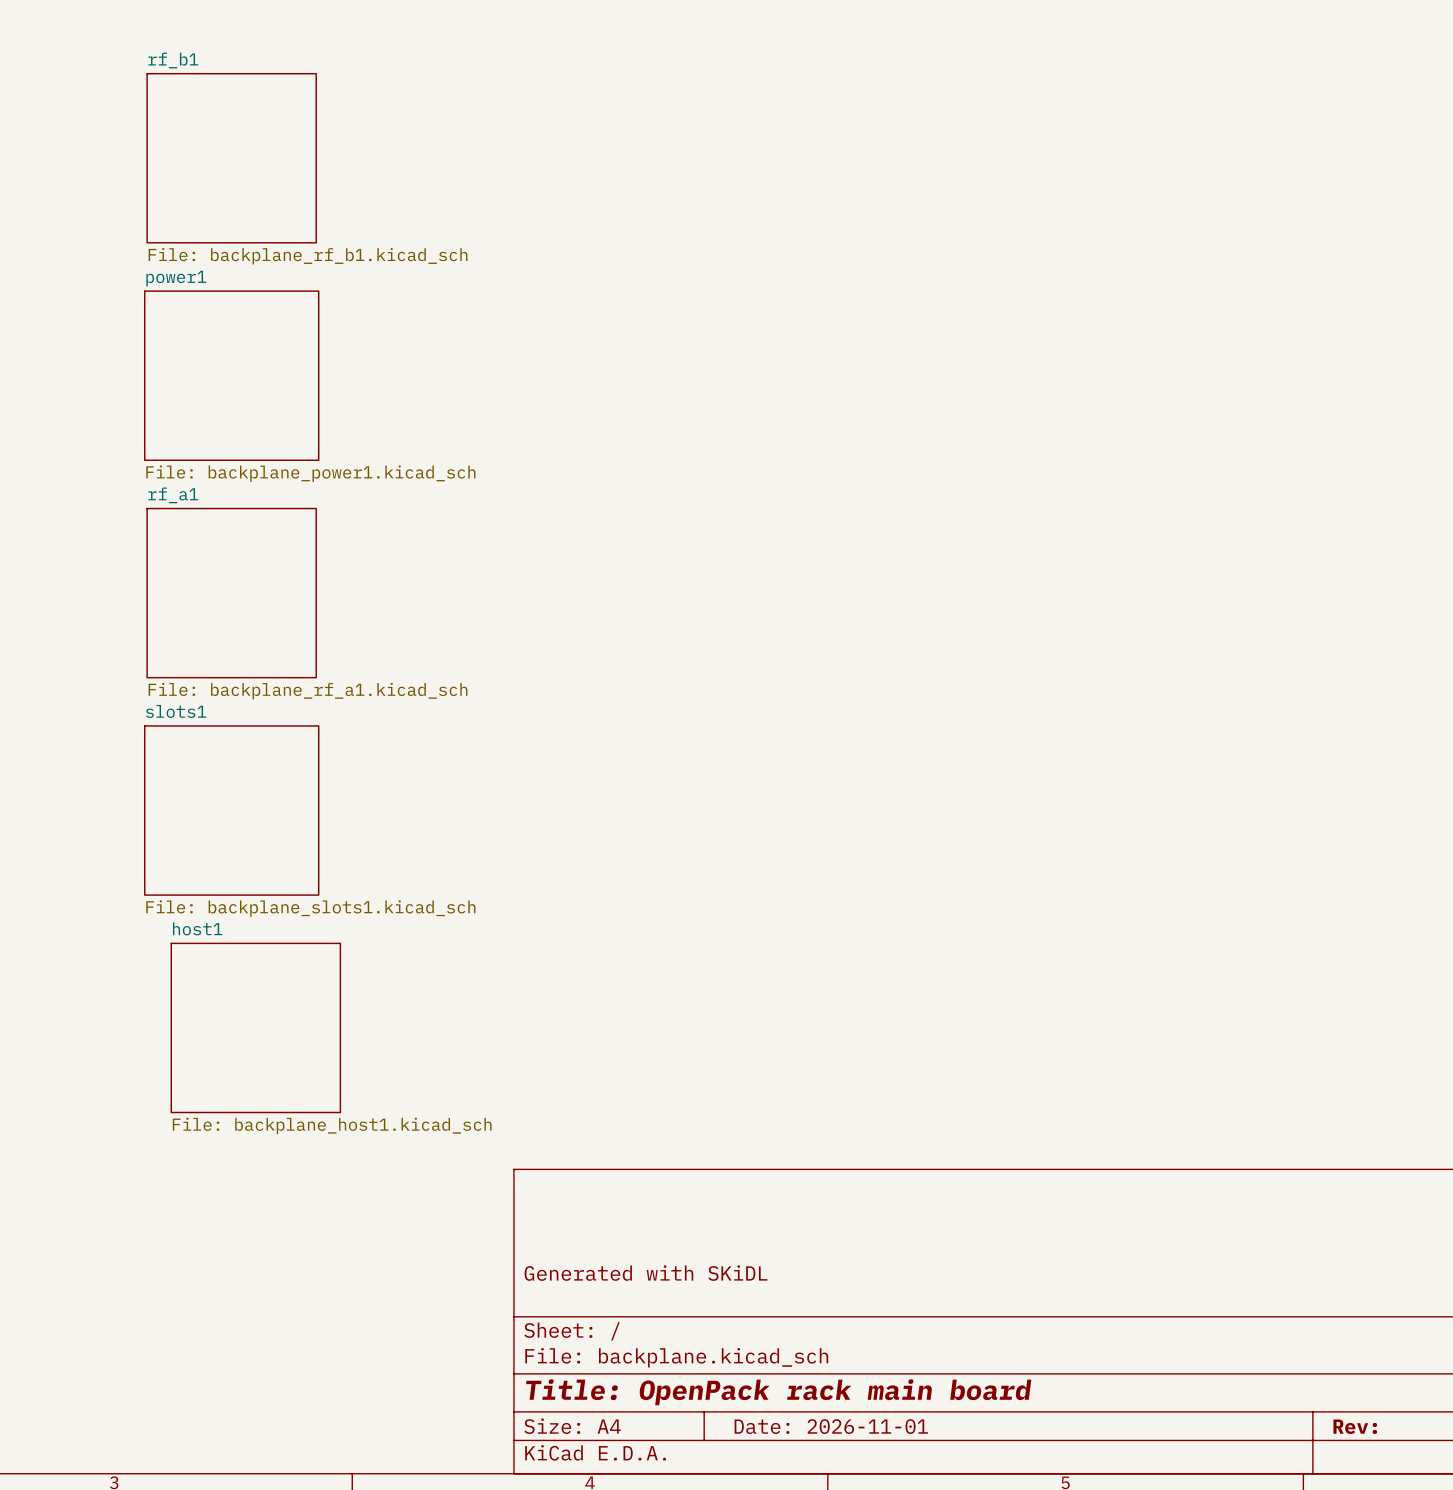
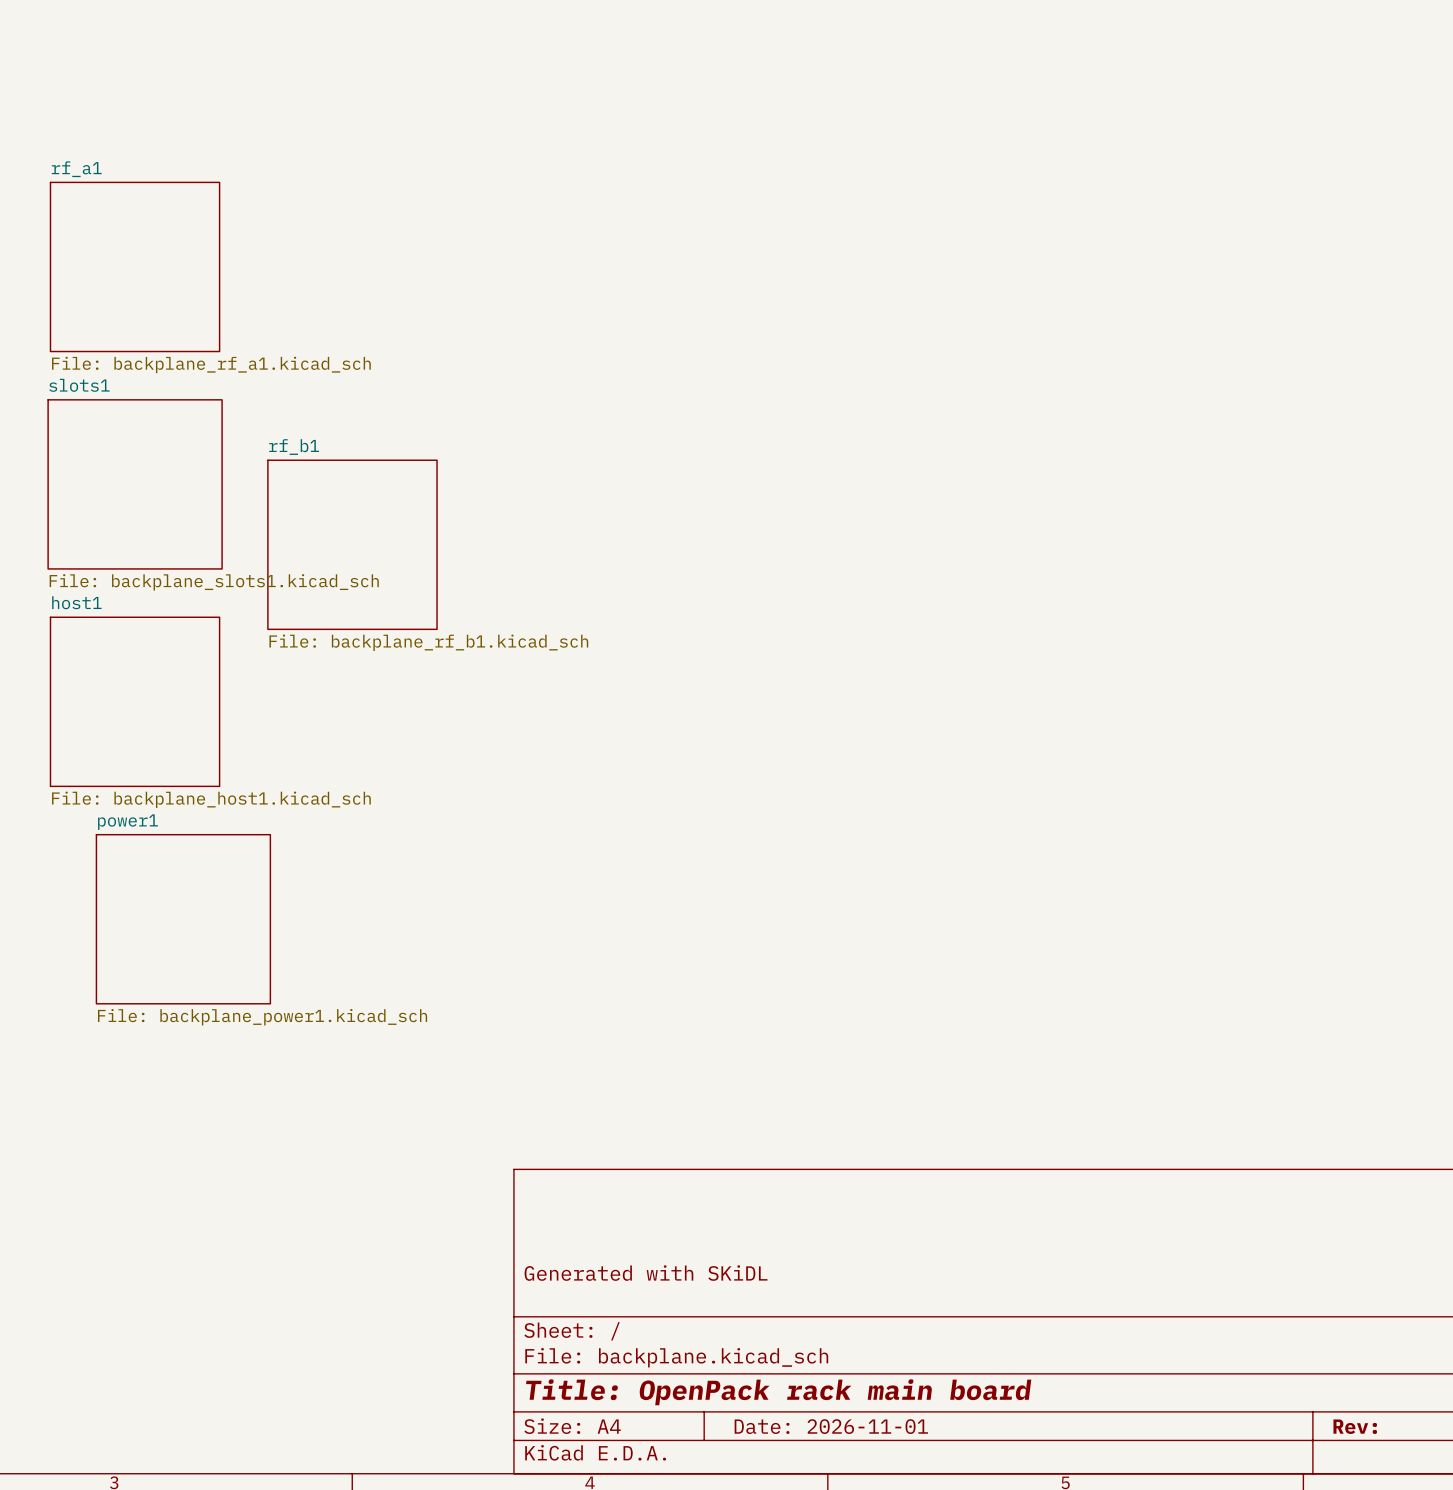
sheet rf_b1 position: (231, 158) -> (352, 544)
sheet power1 position: (231, 375) -> (183, 919)
sheet rf_a1 position: (231, 593) -> (135, 266)
sheet slots1 position: (231, 810) -> (135, 484)
sheet host1 position: (255, 1027) -> (135, 701)

